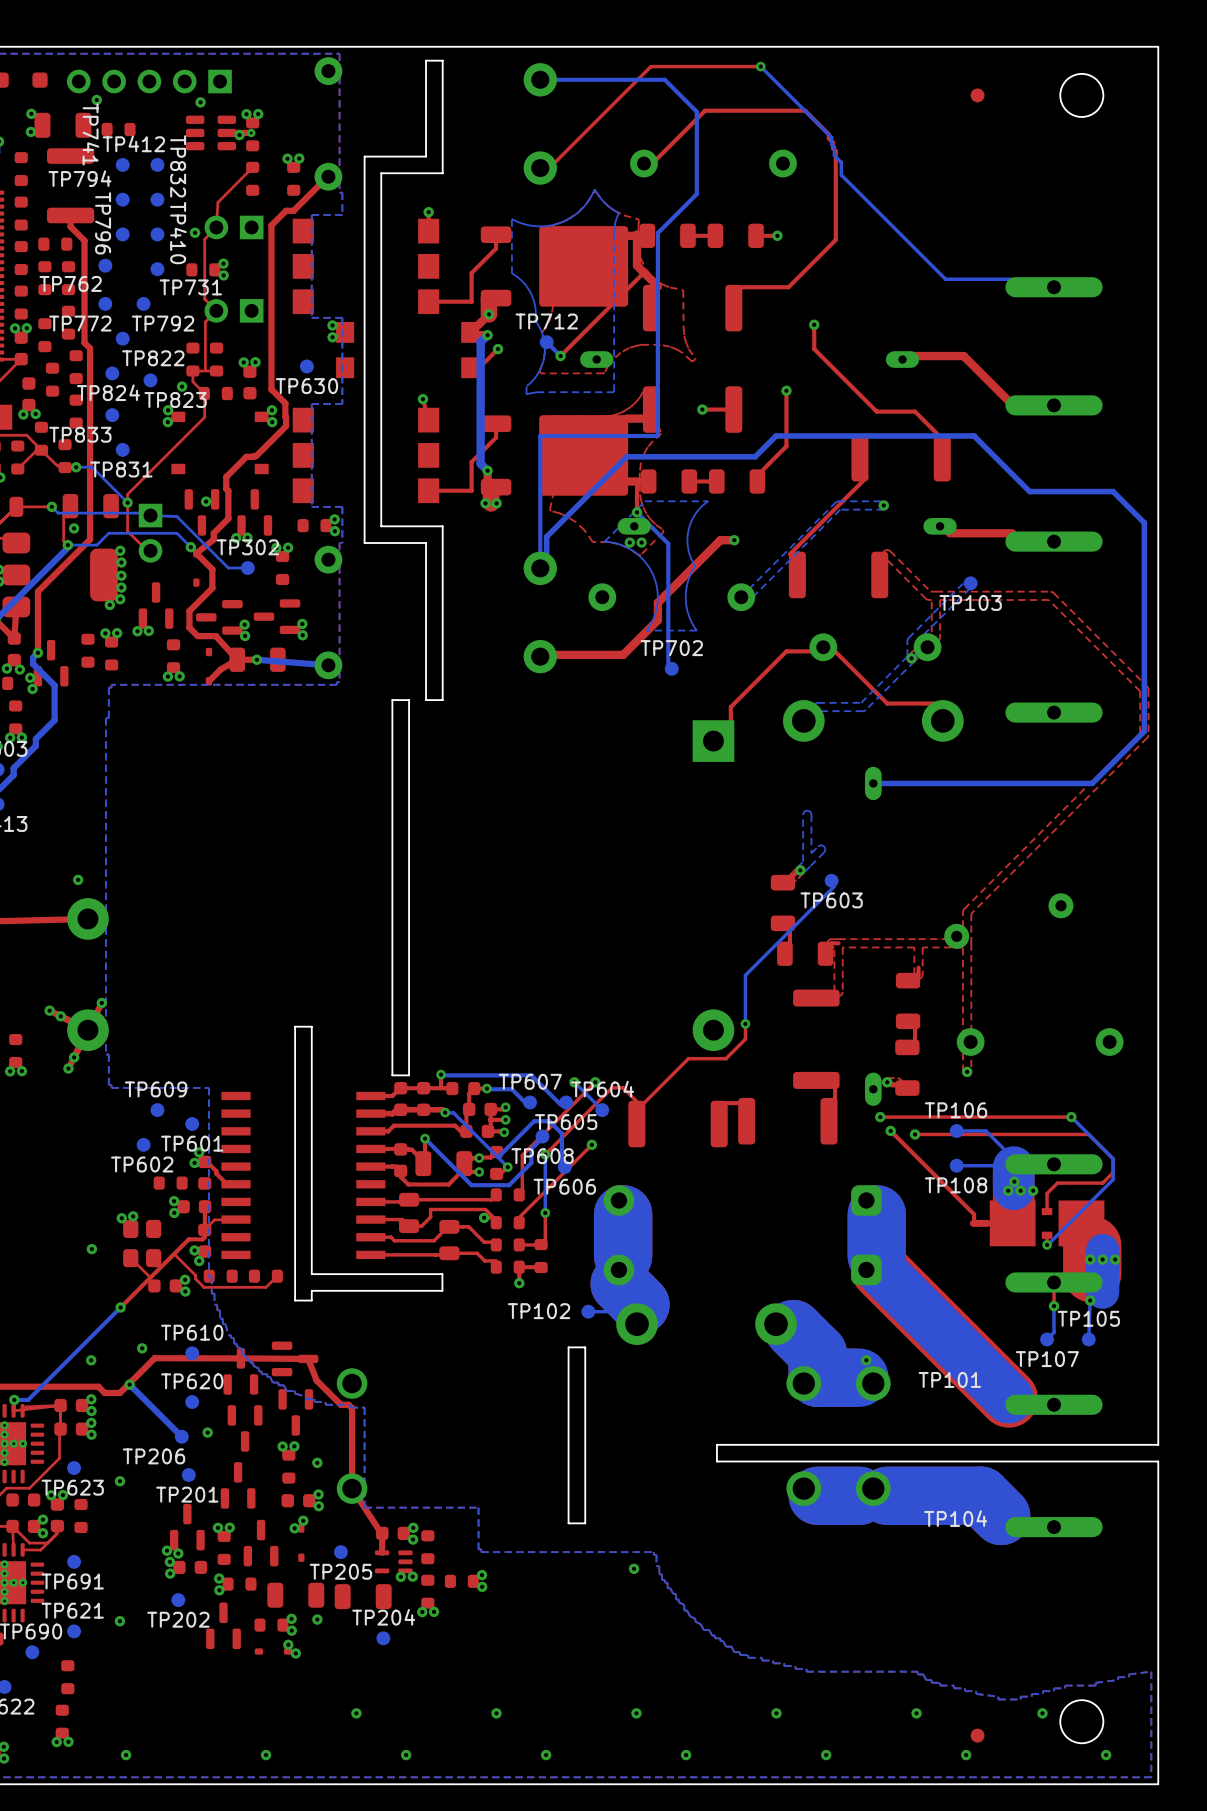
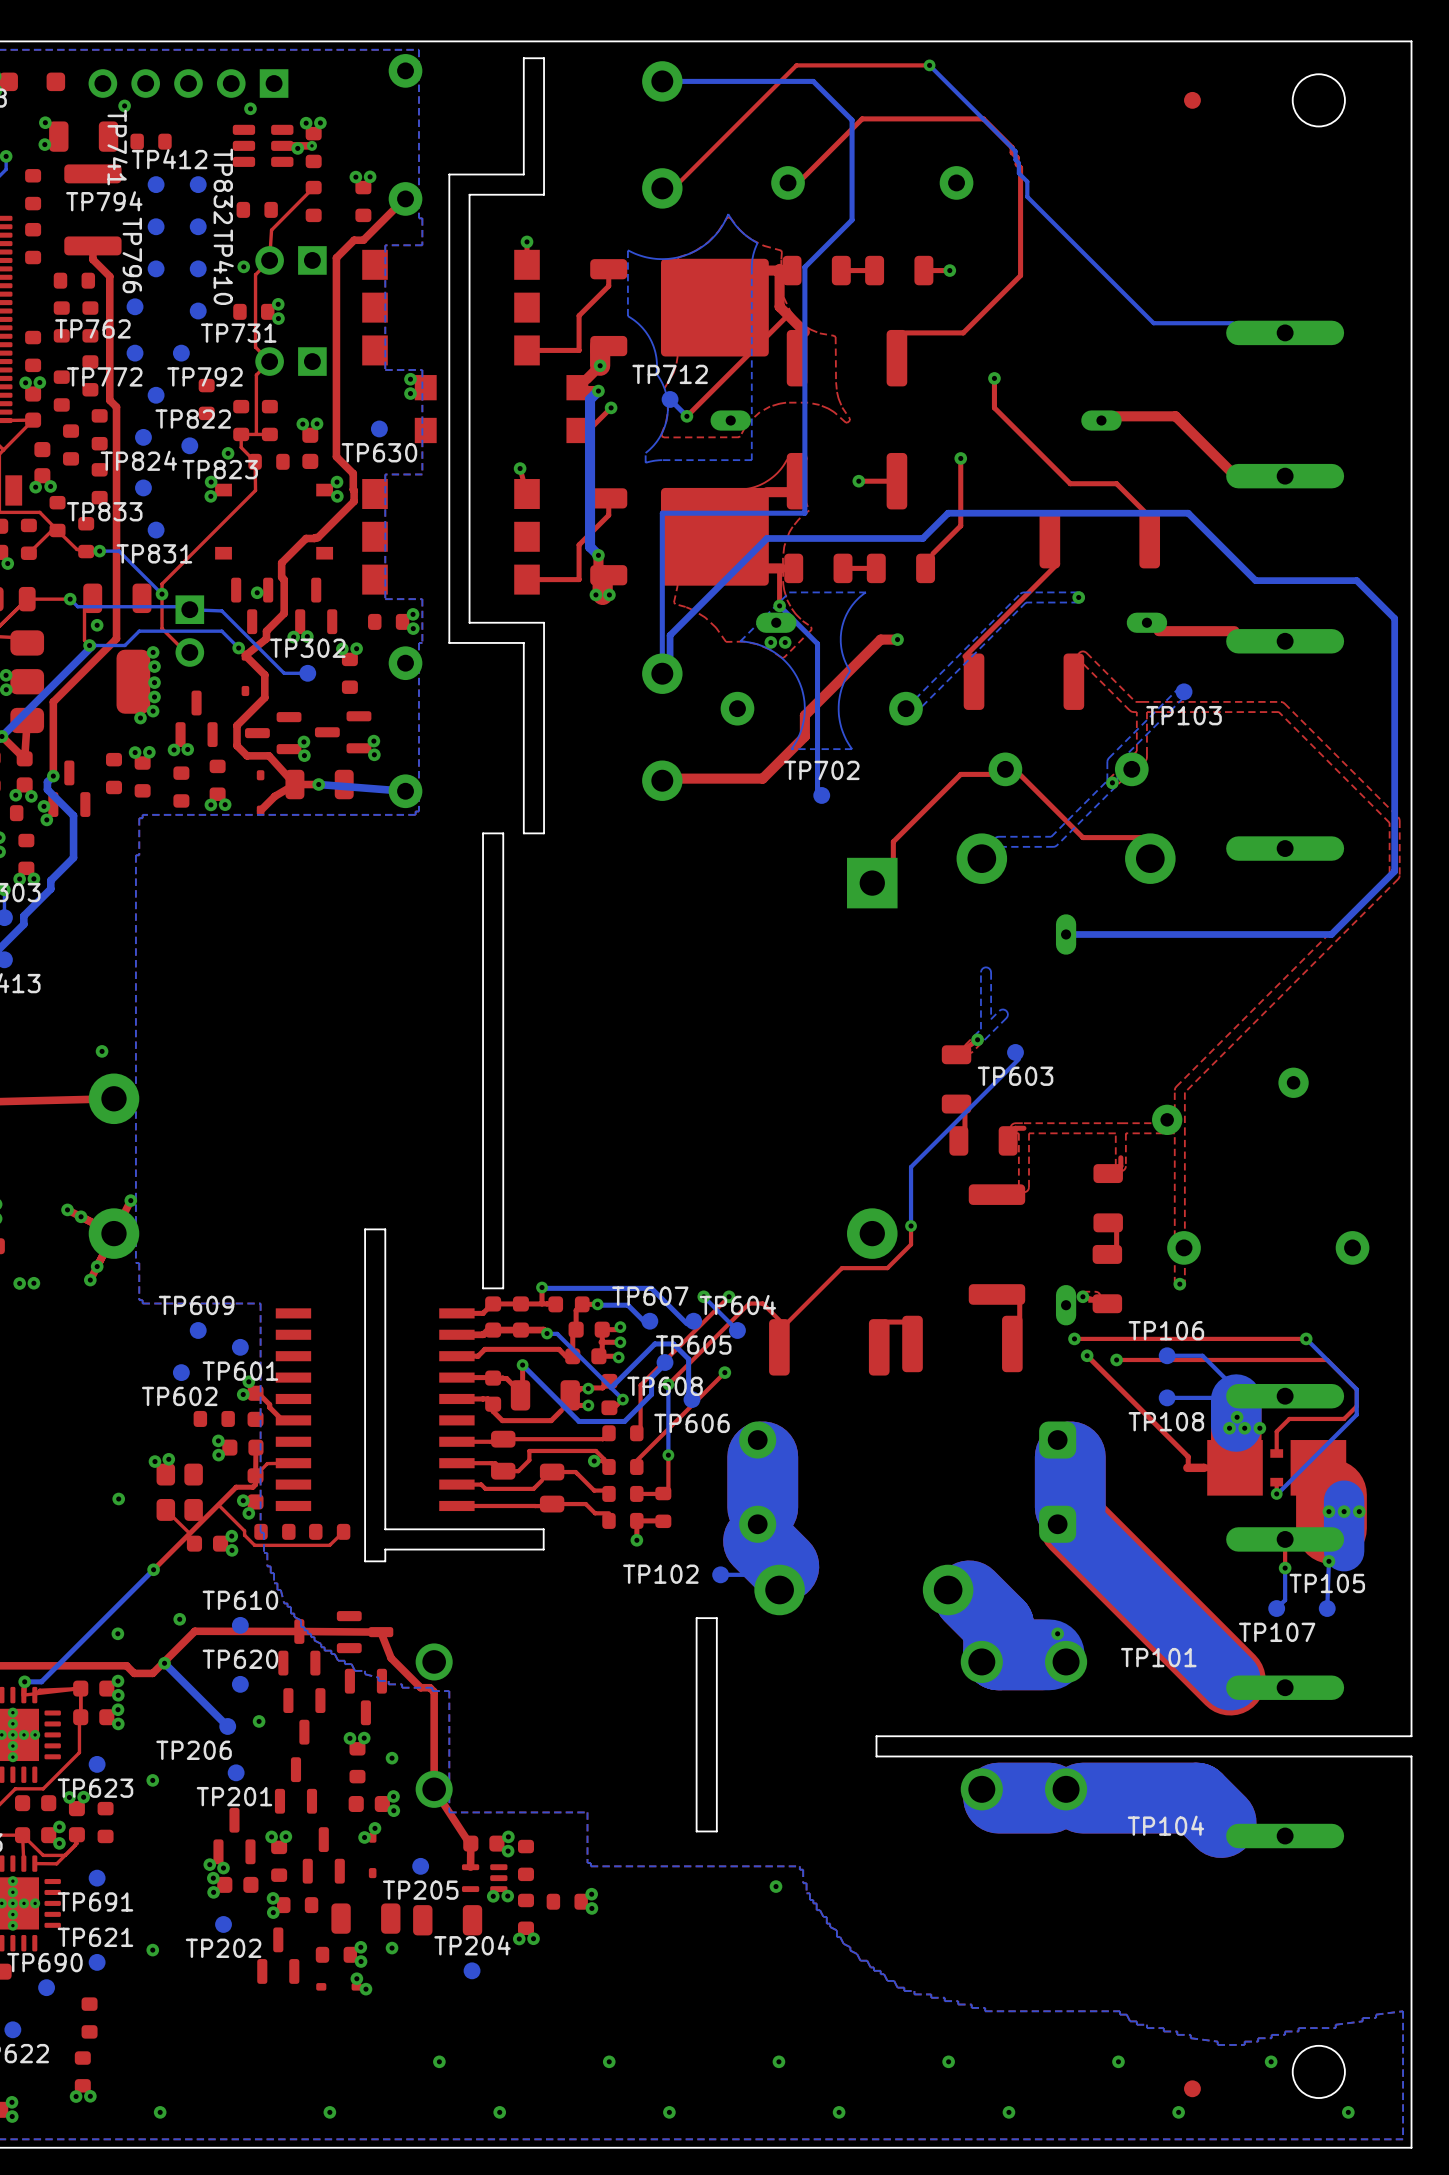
part: none -> (257, 209)
part: (21, 258) -> none
part: none -> (206, 399)
part: none -> (181, 787)
part: (15, 1051) -> none

